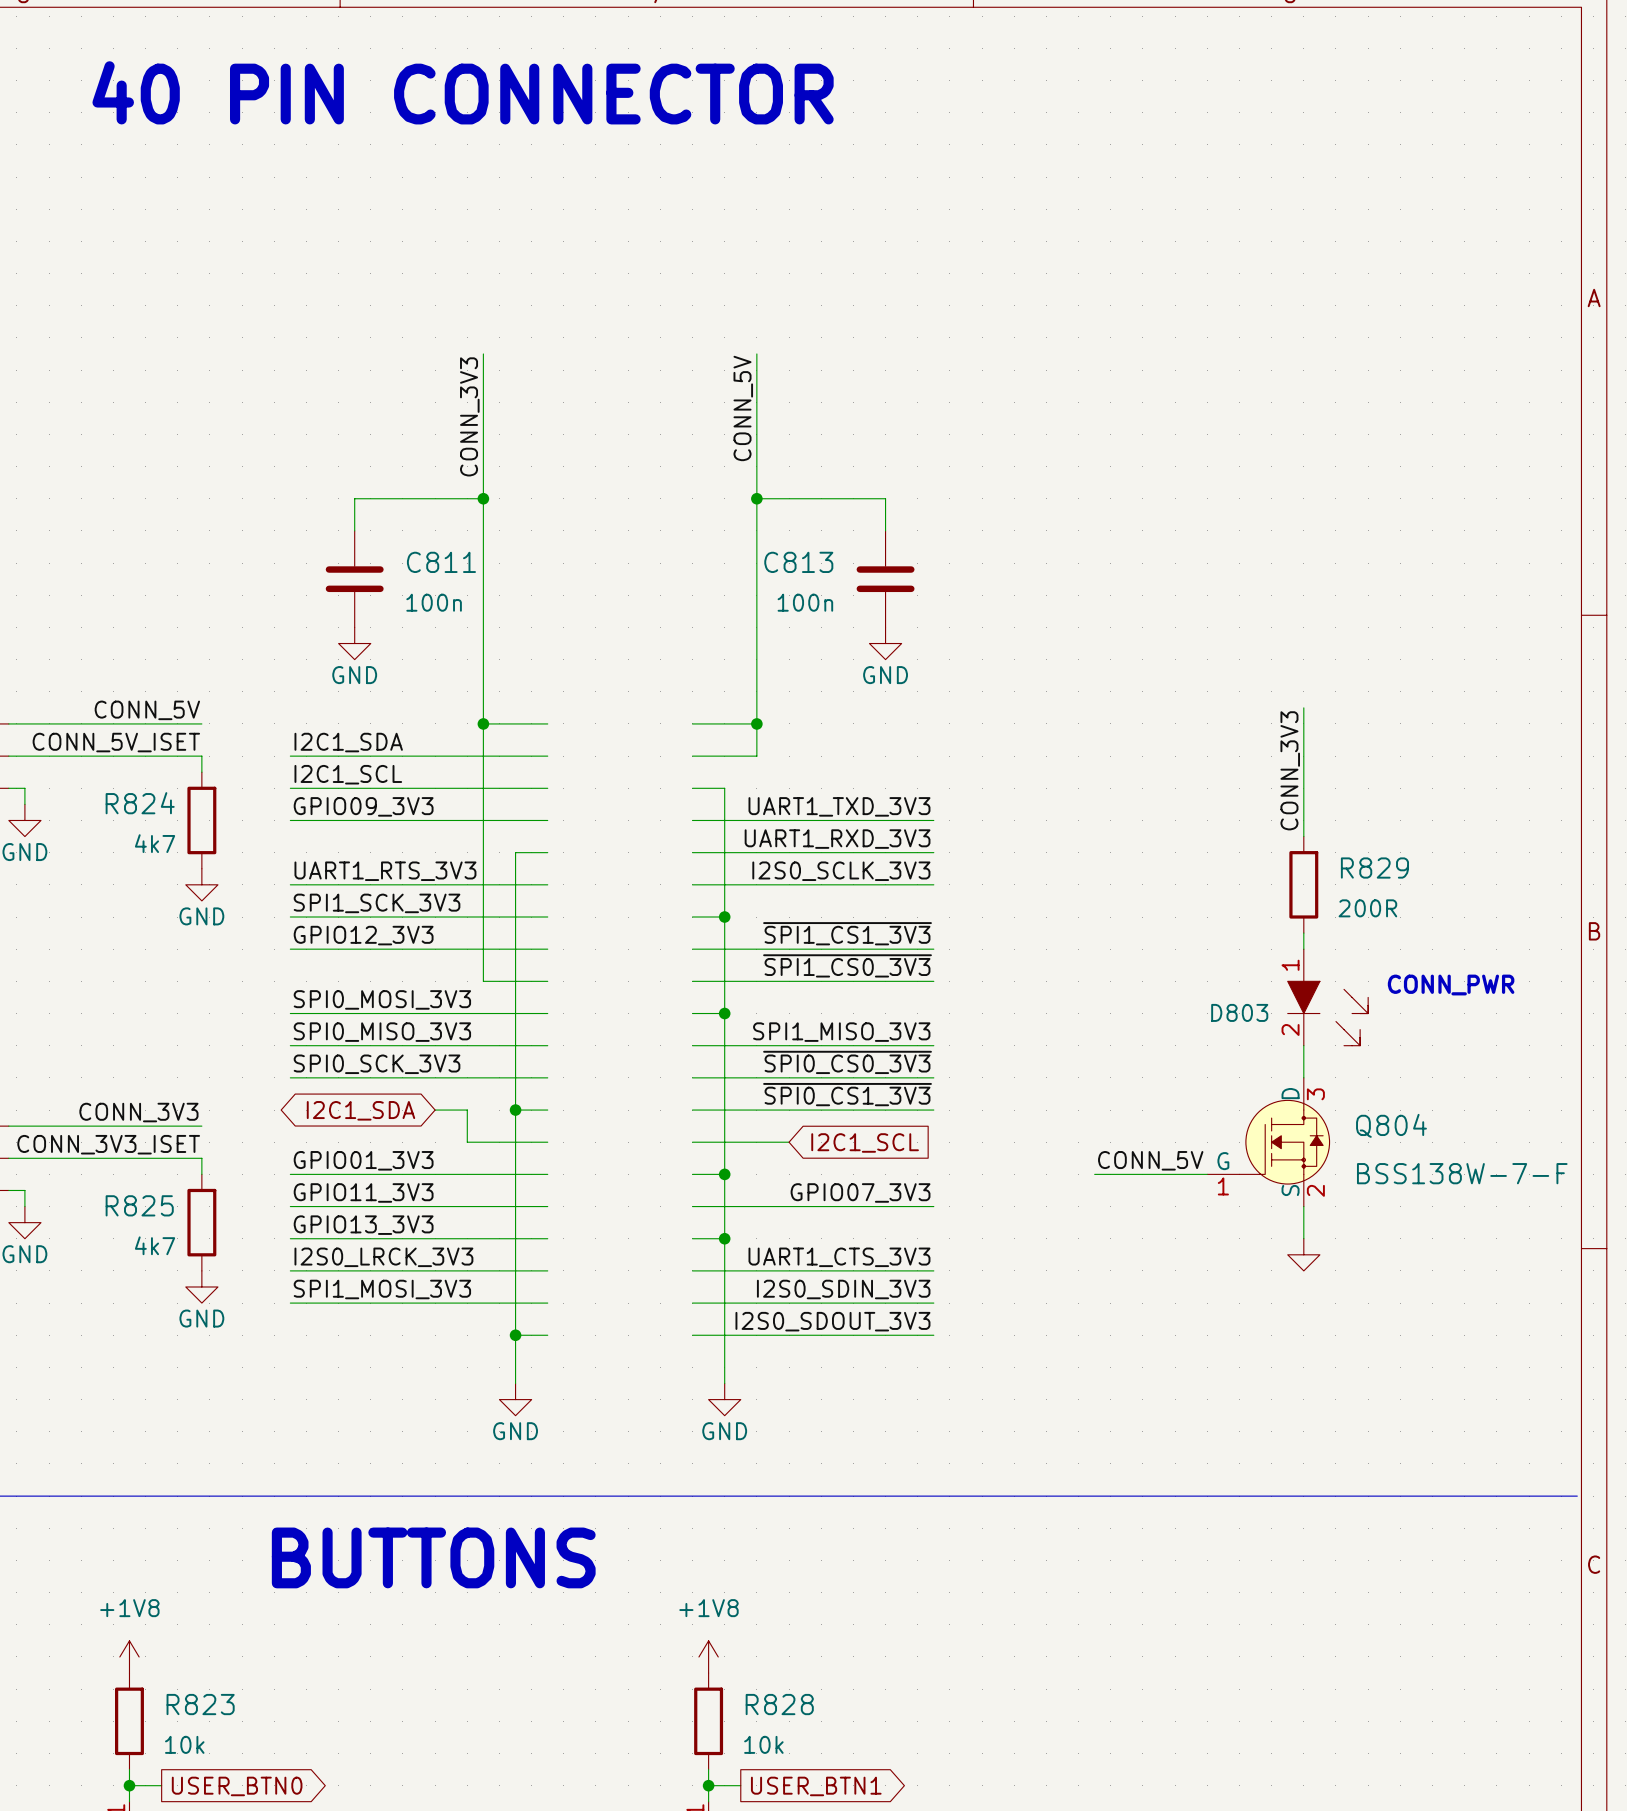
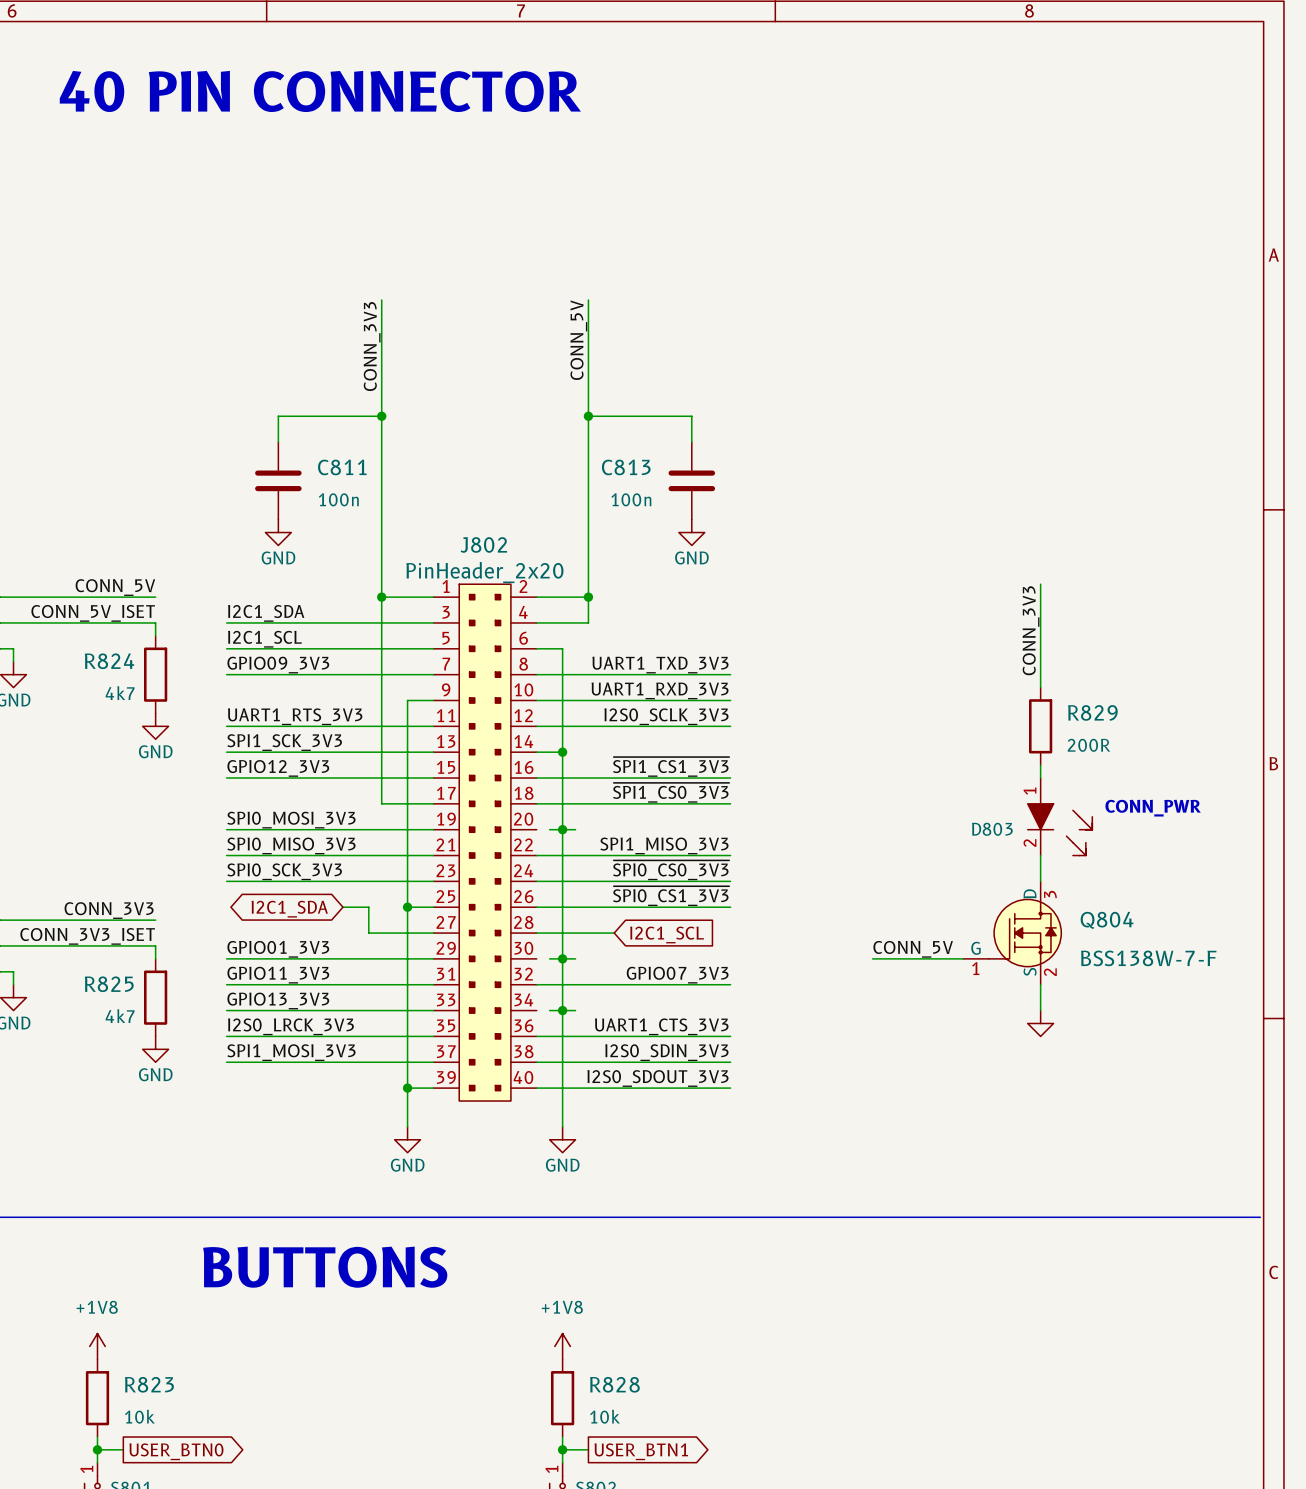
wire: (756, 353) (756, 756) (740, 756) -> (588, 299) (588, 622)
label position: CONN_5V (743, 408) -> CONN_5V (578, 340)
wire: none -> (588, 416) (601, 416)
junction position: (756, 498) -> (588, 416)
wire: (869, 498) (885, 498) (885, 530) -> (691, 416) (691, 442)
C813 position: (885, 579) -> (691, 480)
power symbol position: GND (885, 643) -> GND (691, 532)
wire: (740, 723) (756, 723) -> (536, 597) (549, 597)
junction position: (756, 723) -> (588, 597)
wire: none -> (536, 622) (549, 622)
wire: none -> (536, 648) (549, 648)
wire: (708, 788) (724, 788) (724, 1383) -> (562, 648) (562, 1126)
label position: UART1_TXD_3V3 (839, 806) -> UART1_TXD_3V3 (660, 665)
wire: (917, 820) (933, 820) -> (536, 674) (549, 674)
label position: UART1_RXD_3V3 (837, 839) -> UART1_RXD_3V3 (660, 690)
wire: (917, 852) (933, 852) -> (536, 700) (549, 700)
label position: I2S0_SCLK_3V3 (841, 871) -> I2S0_SCLK_3V3 (666, 716)
wire: (917, 884) (933, 884) -> (536, 726) (549, 726)
wire: (708, 917) (724, 917) -> (536, 752) (549, 752)
junction position: (724, 917) -> (562, 752)
label position: ~{SPI1_CS1_3V3} (847, 933) -> ~{SPI1_CS1_3V3} (671, 766)
wire: (917, 949) (933, 949) -> (536, 778) (549, 778)
label position: ~{SPI1_CS0_3V3} (847, 965) -> ~{SPI1_CS0_3V3} (671, 792)
wire: (917, 981) (933, 981) -> (536, 803) (549, 803)
junction position: (724, 1013) -> (562, 829)
J802: none -> PinHeader_2x20 (485, 842)
label position: SPI1_MISO_3V3 (841, 1032) -> SPI1_MISO_3V3 (664, 845)
wire: (917, 1045) (933, 1045) -> (536, 855) (549, 855)
label position: ~{SPI0_CS0_3V3} (847, 1062) -> ~{SPI0_CS0_3V3} (671, 870)
wire: (917, 1077) (933, 1077) -> (536, 881) (549, 881)
label position: ~{SPI0_CS1_3V3} (847, 1094) -> ~{SPI0_CS1_3V3} (671, 896)
wire: (917, 1110) (933, 1110) -> (536, 907) (549, 907)
wire: (772, 1142) (789, 1142) -> (536, 933) (549, 933)
global label position: I2C1_SCL (865, 1142) -> I2C1_SCL (667, 934)
junction position: (724, 1174) -> (562, 958)
label position: GPIO07_3V3 (860, 1192) -> GPIO07_3V3 (677, 975)
wire: (917, 1206) (933, 1206) -> (536, 984) (549, 984)
junction position: (724, 1238) -> (562, 1010)
label position: UART1_CTS_3V3 (839, 1257) -> UART1_CTS_3V3 (661, 1026)
wire: (917, 1270) (933, 1270) -> (536, 1036) (549, 1036)
label position: I2S0_SDIN_3V3 (843, 1289) -> I2S0_SDIN_3V3 (666, 1052)
wire: (917, 1303) (933, 1303) -> (536, 1062) (549, 1062)
label position: I2S0_SDOUT_3V3 (832, 1321) -> I2S0_SDOUT_3V3 (657, 1078)
wire: (917, 1335) (933, 1335) -> (536, 1088) (549, 1088)
power symbol position: GND (724, 1399) -> GND (562, 1139)

